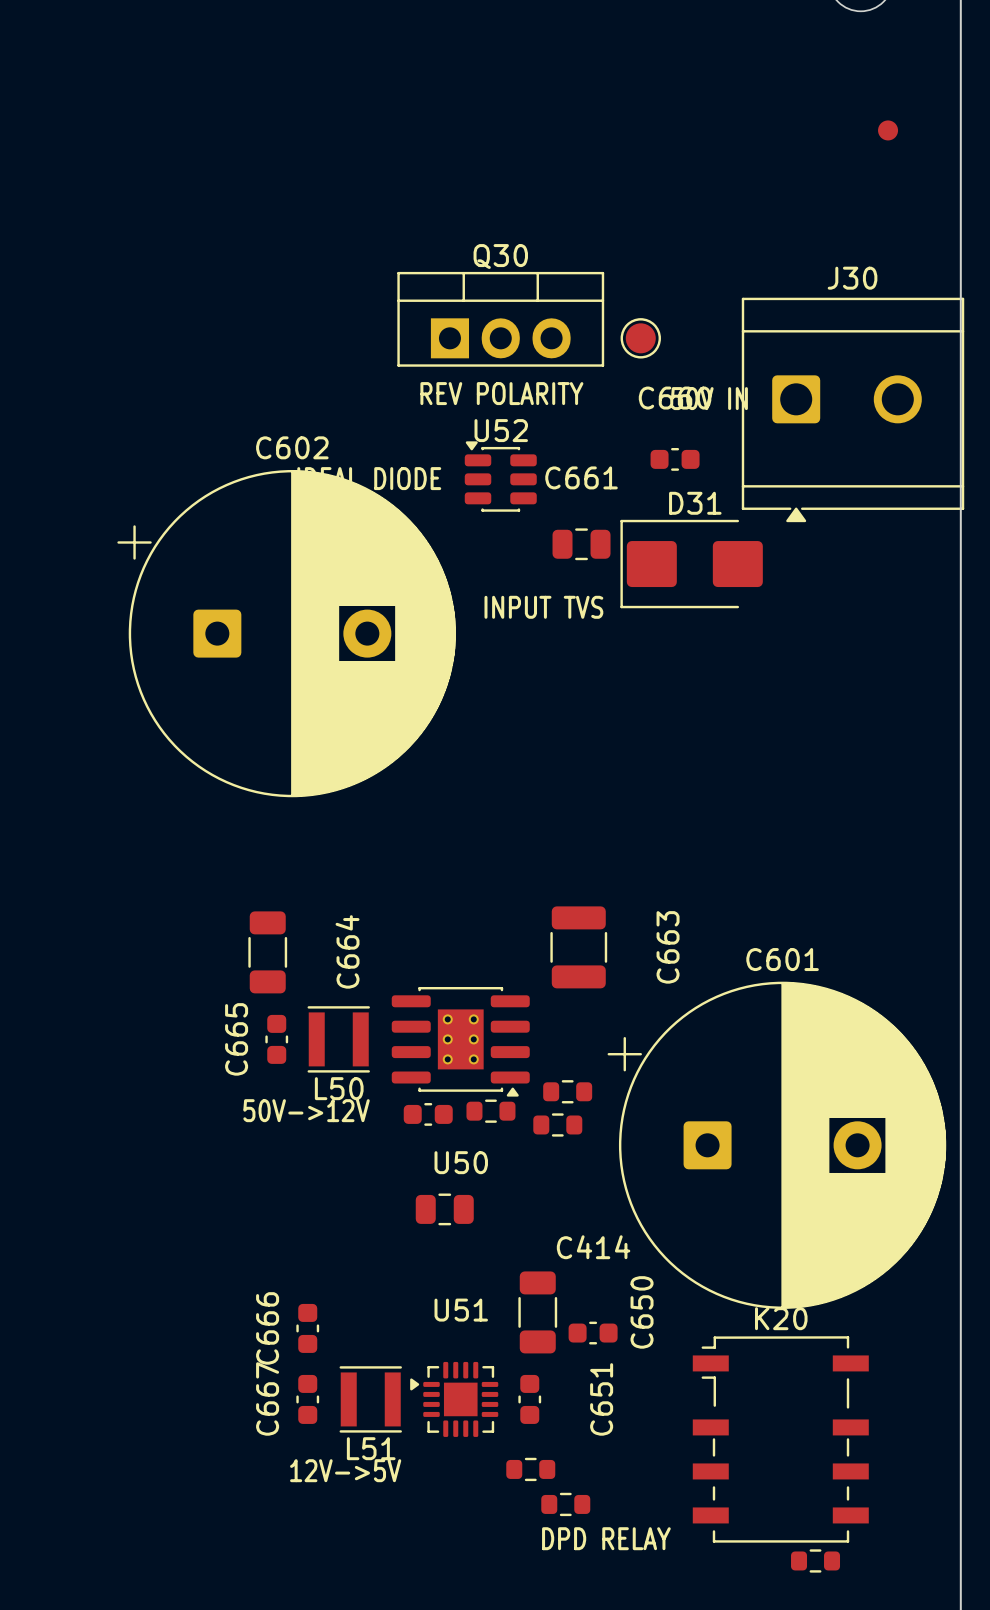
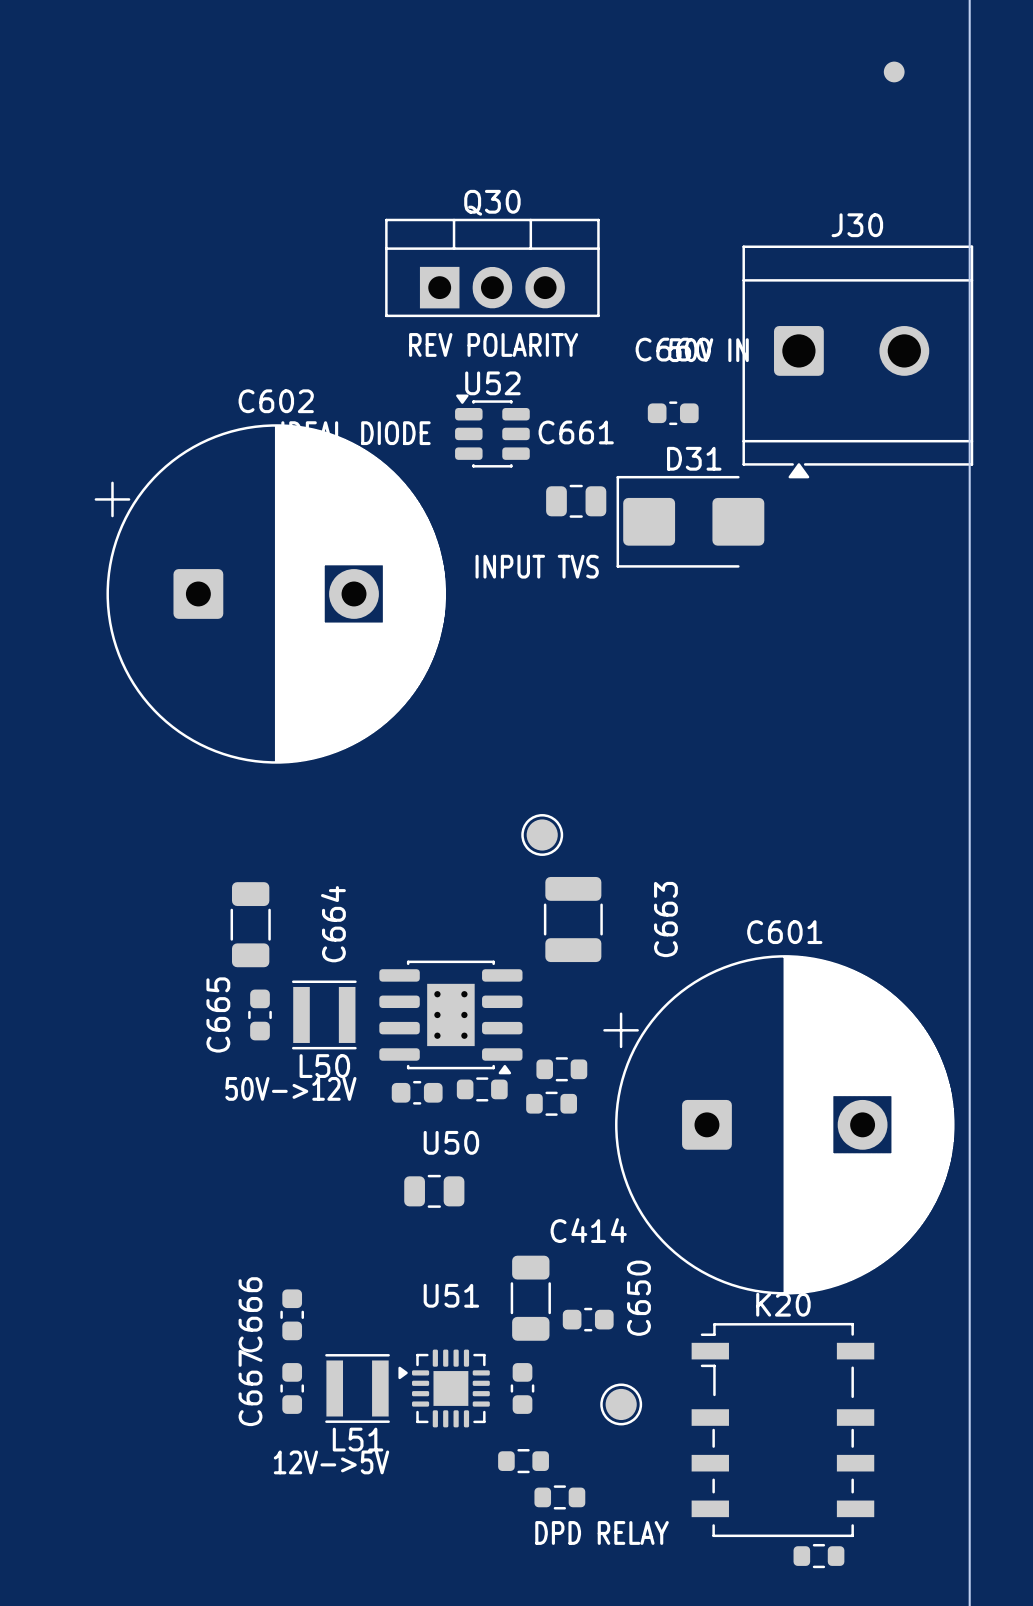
part: (640, 338) -> none
part: none -> (542, 834)
C651 name: C651 (601, 1399) -> none
part: none -> (621, 1404)

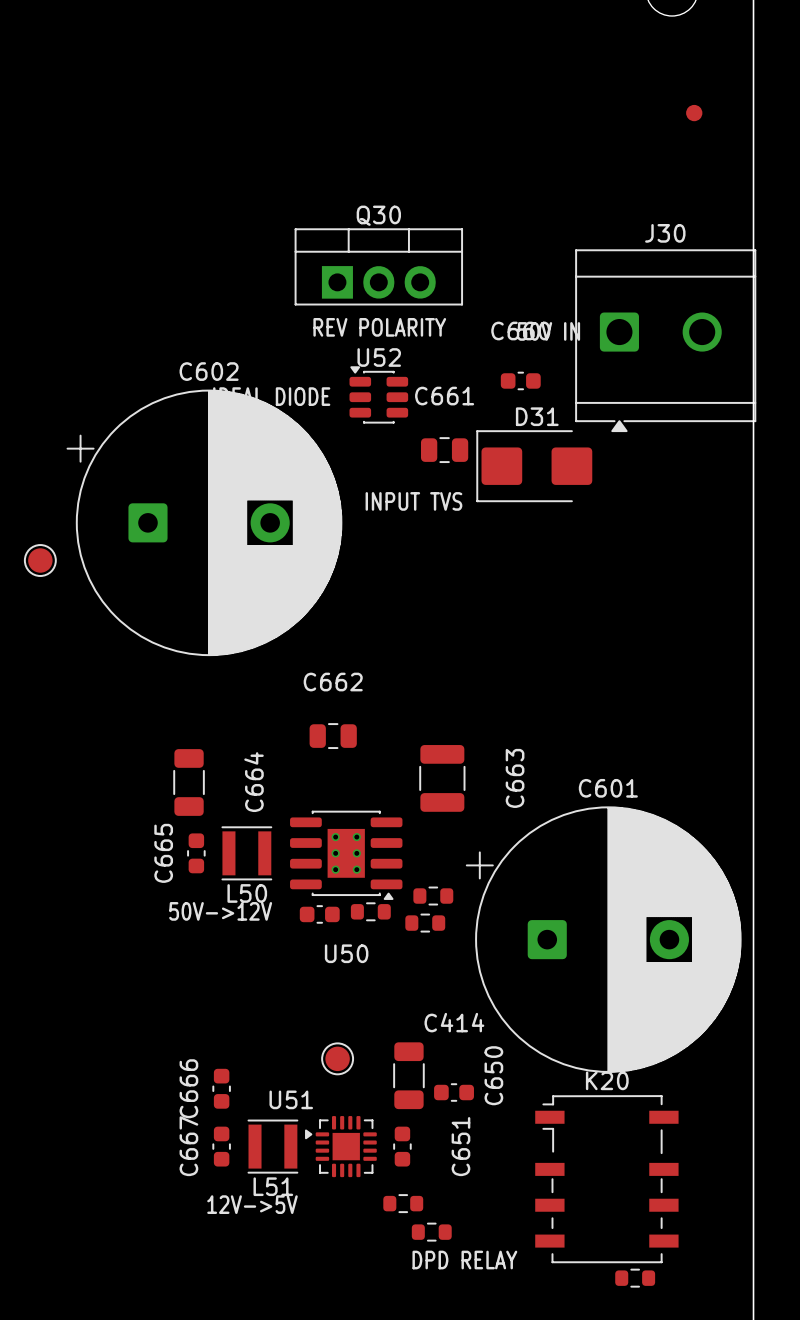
part: none -> (40, 560)
part: (542, 834) -> none
C662: none -> (333, 736)
part: (434, 1191) -> none
U51 name position: U51 (451, 1295) -> U51 (291, 1099)
C651 name: none -> C651 (460, 1146)
part position: (621, 1404) -> (337, 1058)

